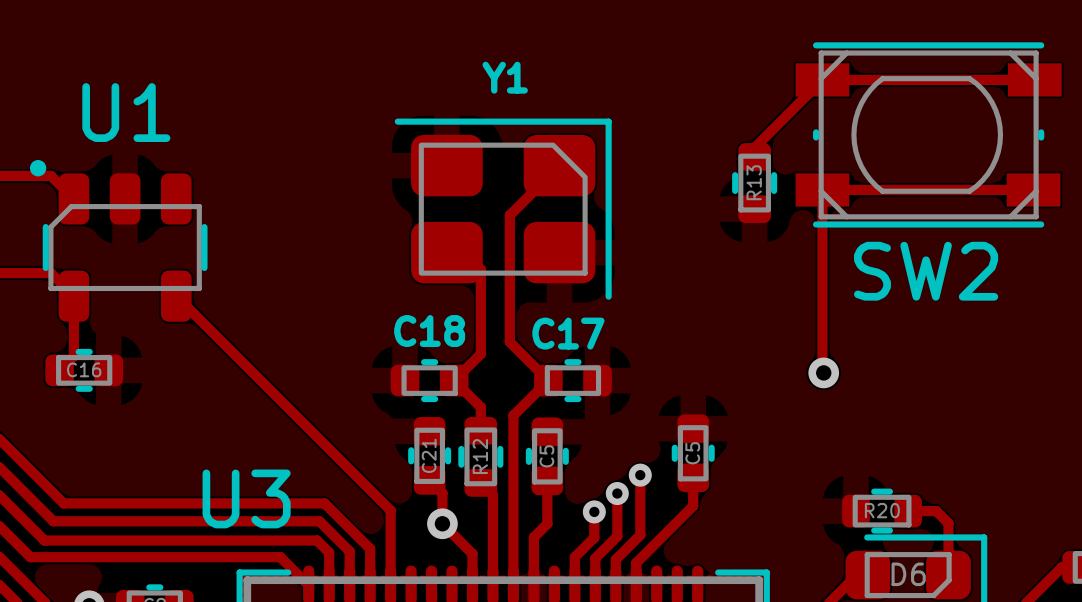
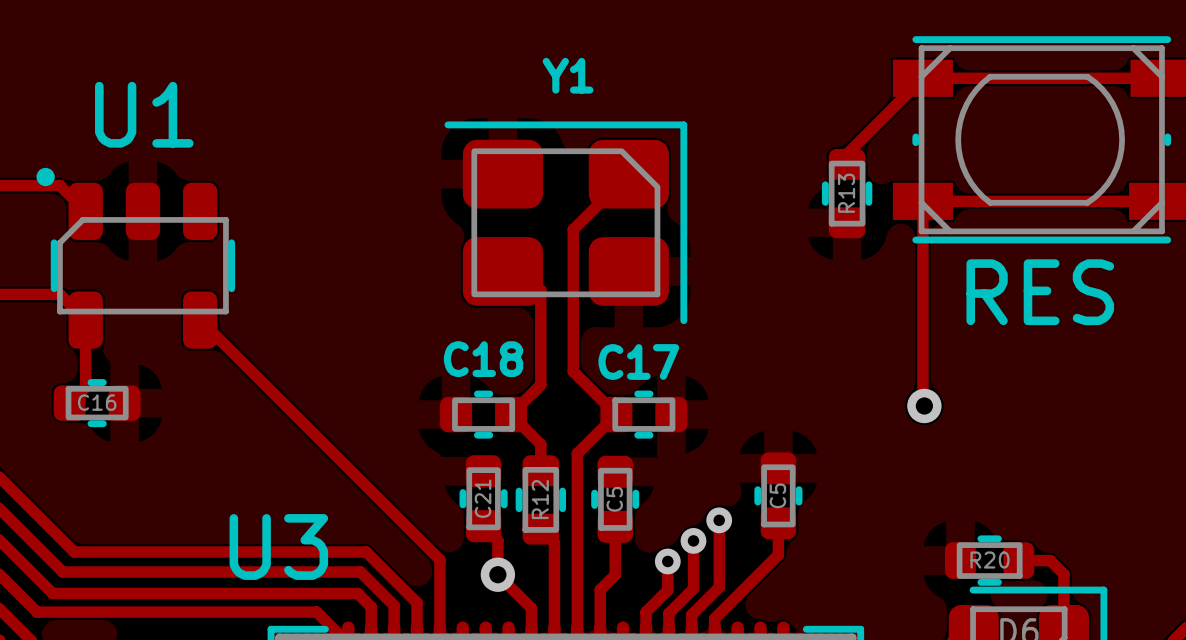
SW2 name: SW2 (926, 271) -> RES (1040, 292)

